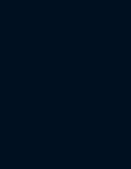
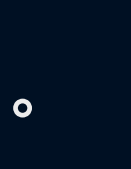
via: none -> (22, 108)

